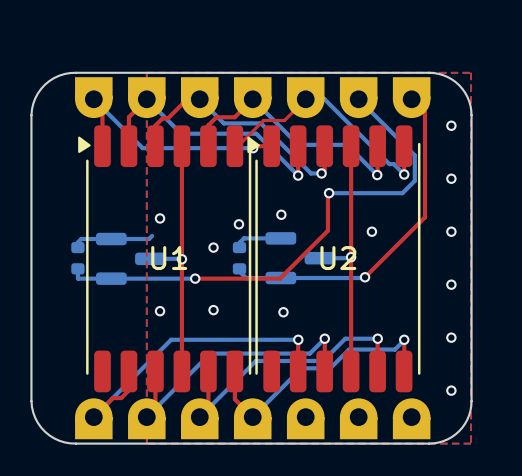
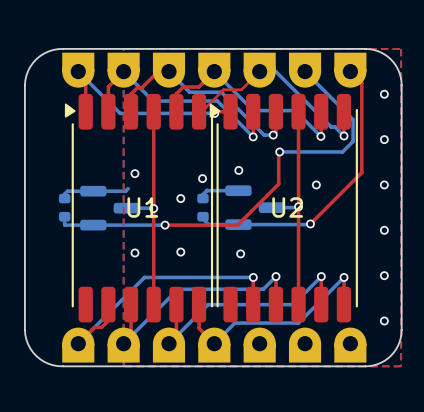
bottom track: (377, 338) (345, 338) (323, 360) (255, 360) (245, 371) -> (321, 276) (293, 304) (207, 304)
bottom track: (404, 339) (394, 349) (349, 349) (330, 368) (301, 368) (276, 393) -> (344, 277) (298, 323) (234, 323)

